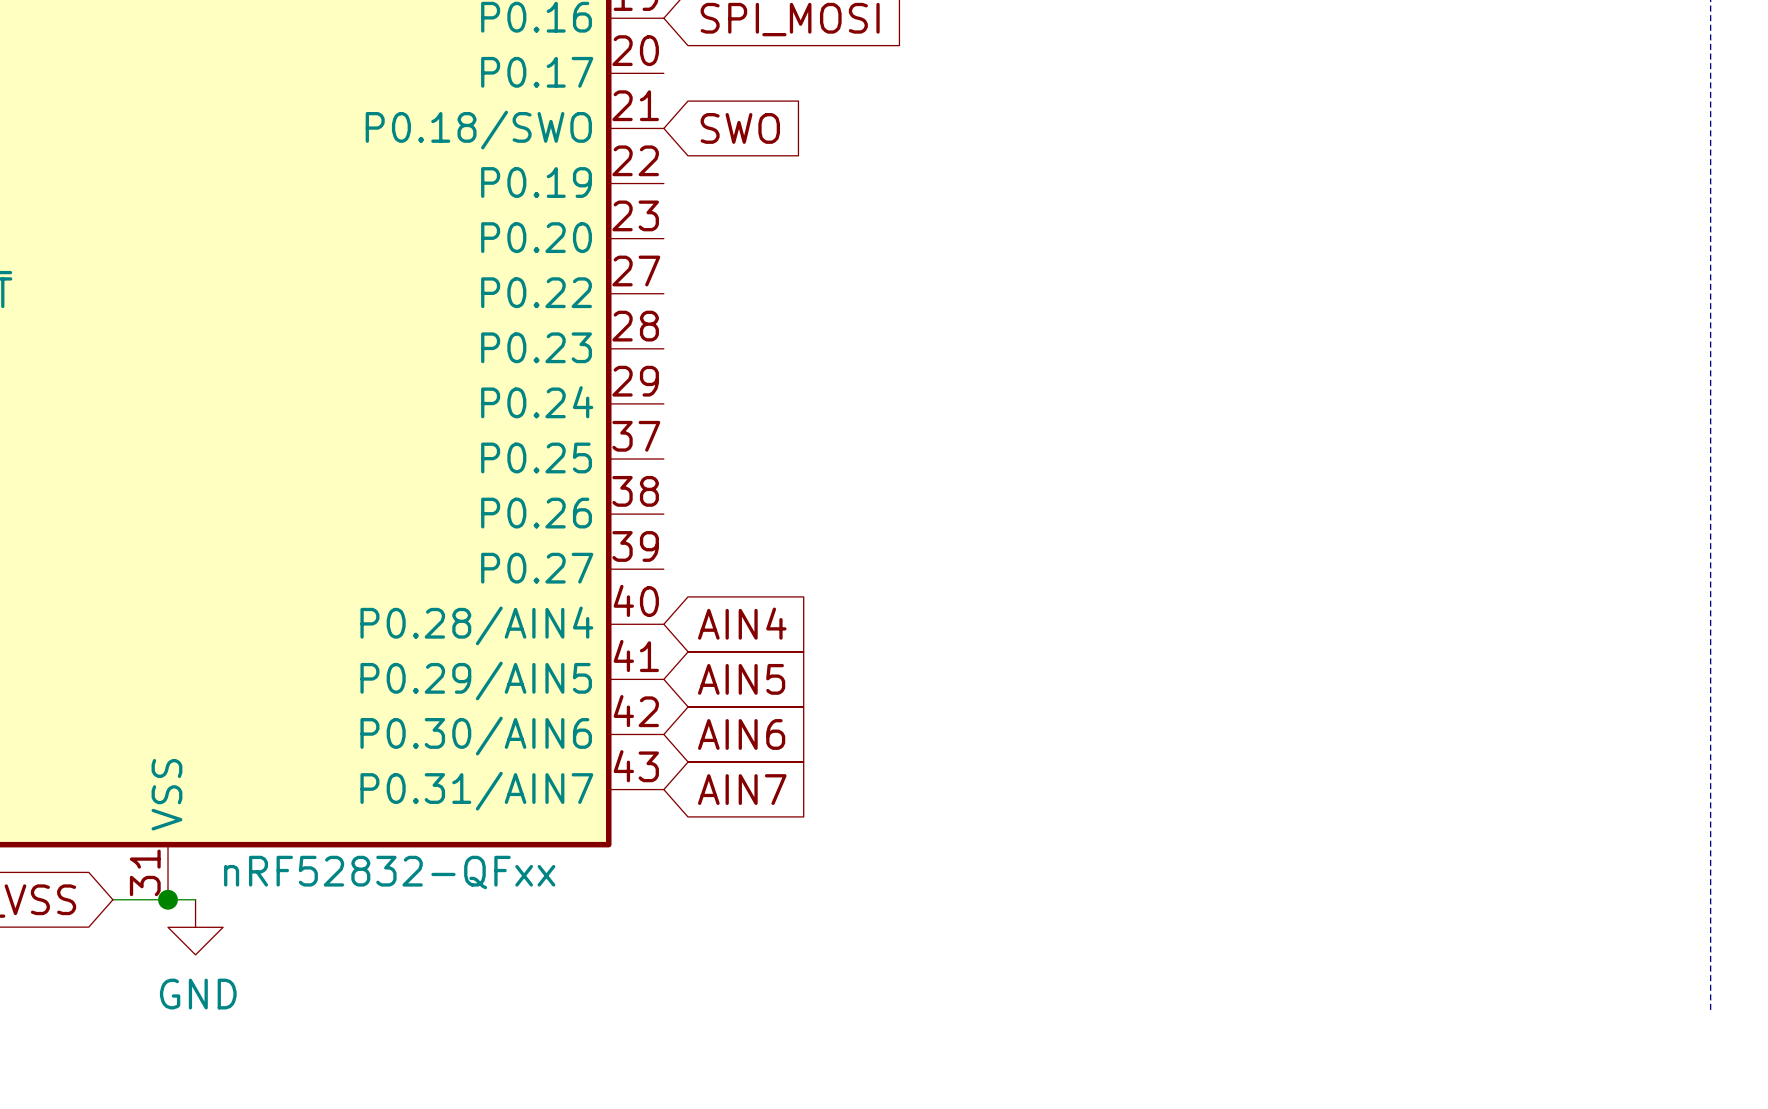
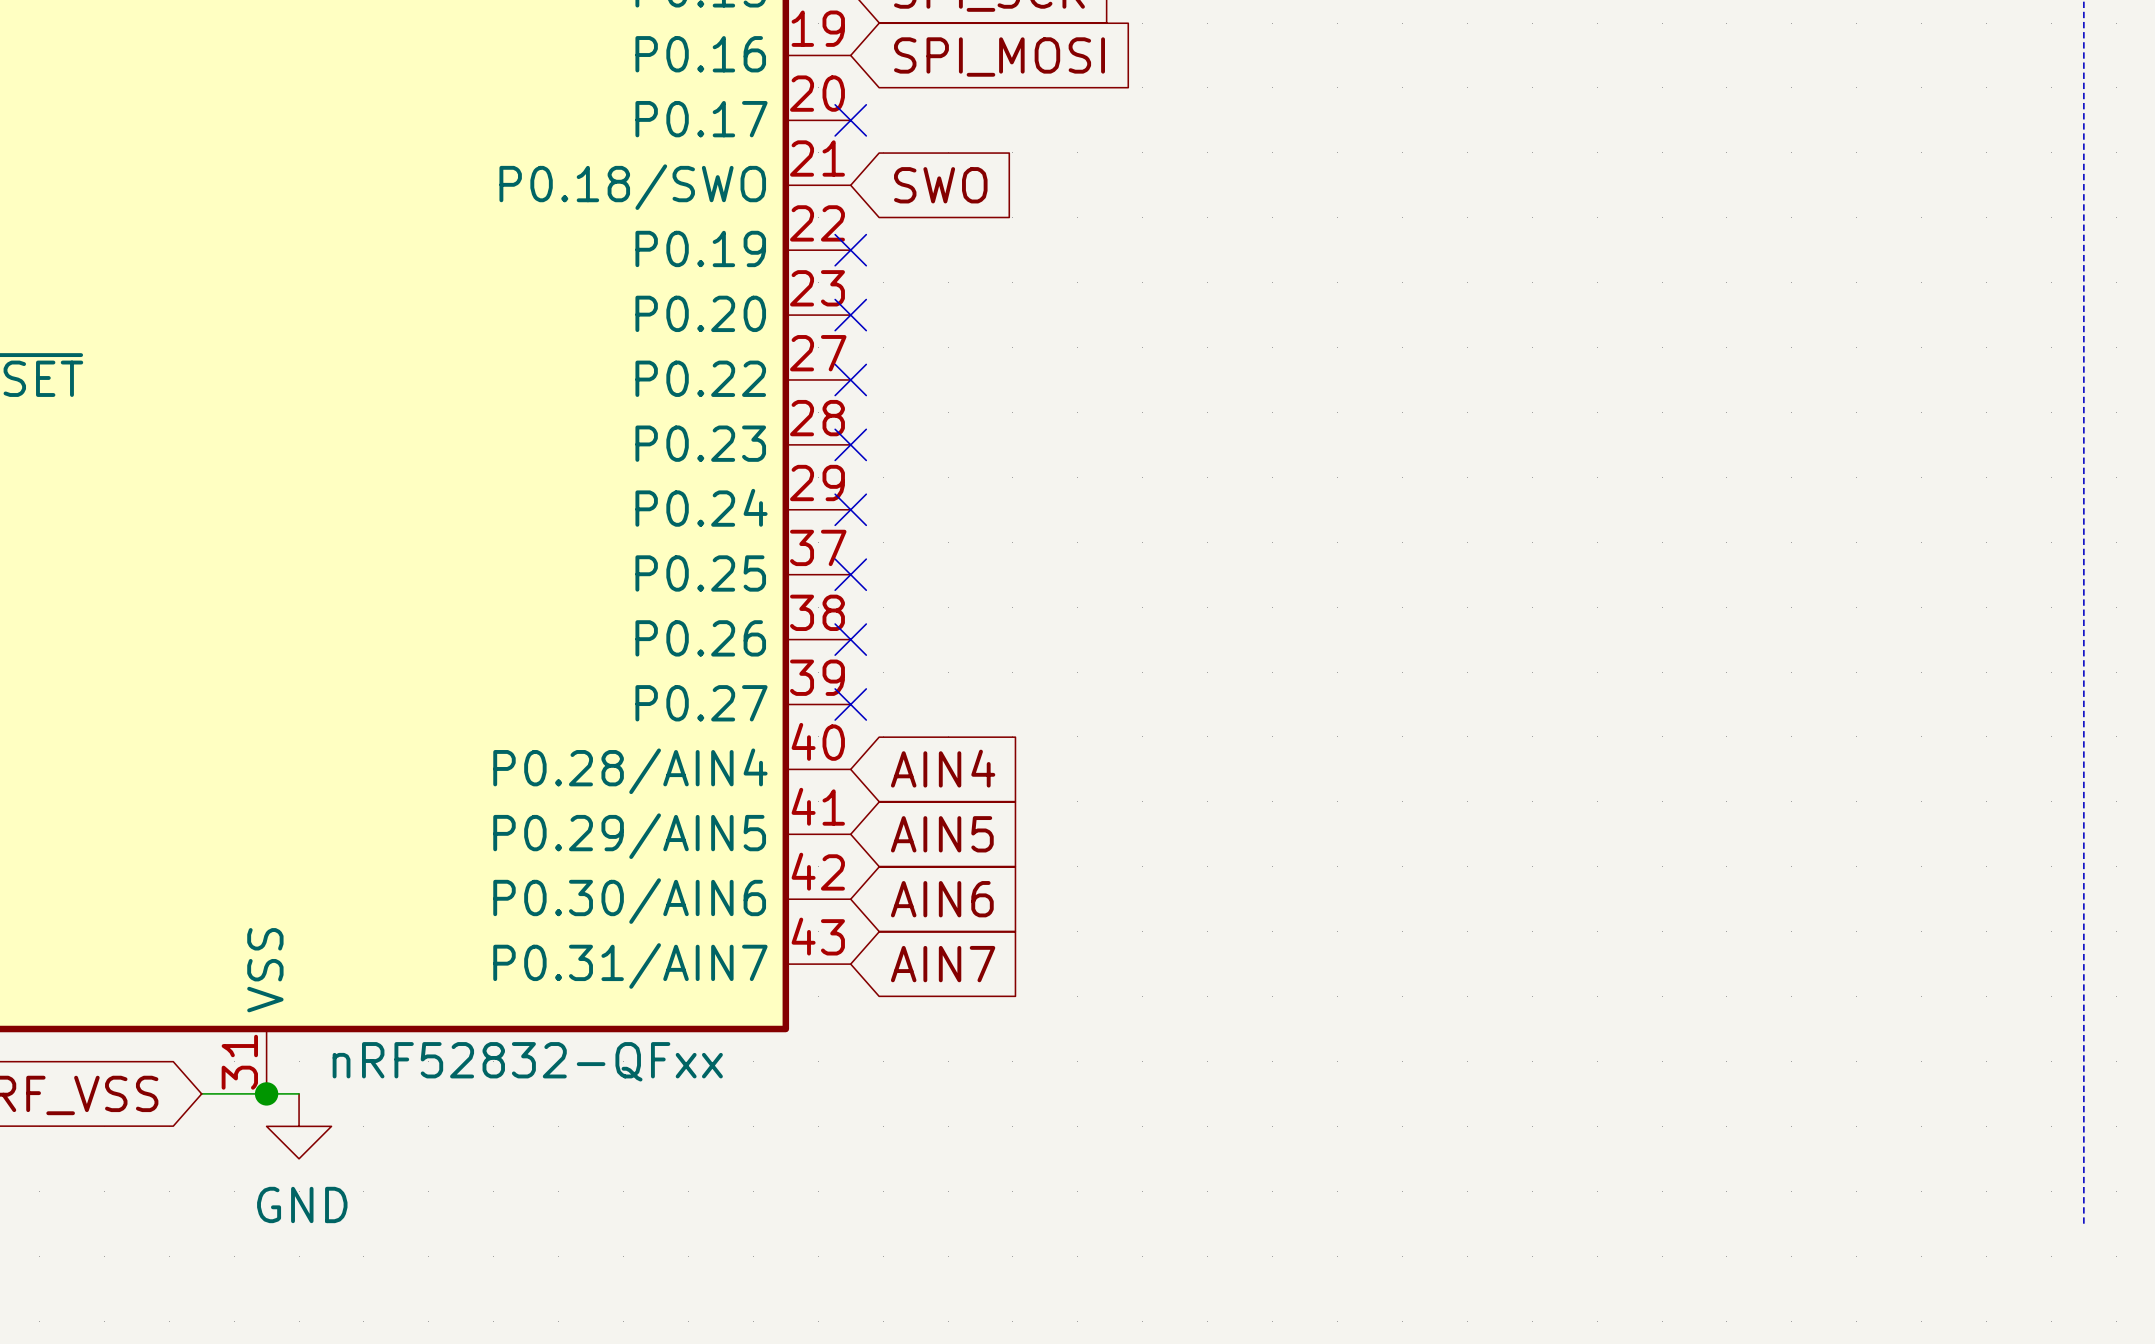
no-connect mark: none -> (850, 120)
no-connect mark: none -> (850, 250)
no-connect mark: none -> (850, 315)
no-connect mark: none -> (850, 379)
no-connect mark: none -> (850, 444)
no-connect mark: none -> (850, 509)
no-connect mark: none -> (850, 574)
no-connect mark: none -> (850, 639)
no-connect mark: none -> (850, 704)

